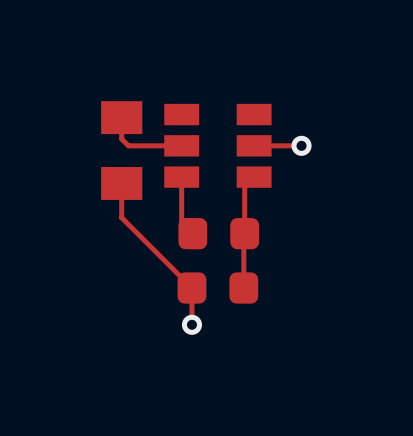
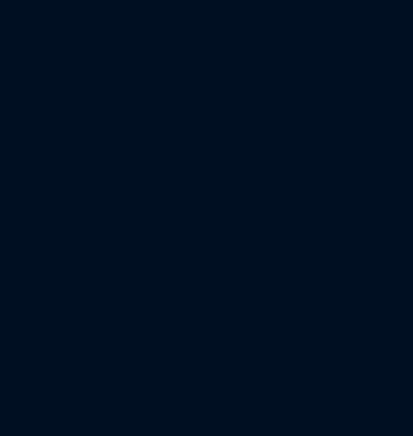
top track: (121, 117) (121, 139) (128, 145) (181, 145) -> none
part: (217, 145) -> none
top track: (301, 145) (254, 145) -> none
via: (301, 145) -> none
part: (121, 150) -> none
top track: (181, 177) (181, 222) (192, 233) -> none
top track: (254, 177) (244, 186) (243, 288) -> none
top track: (121, 183) (121, 217) (191, 288) (191, 324) -> none
part: (218, 233) -> none
part: (217, 288) -> none
via: (191, 324) -> none

